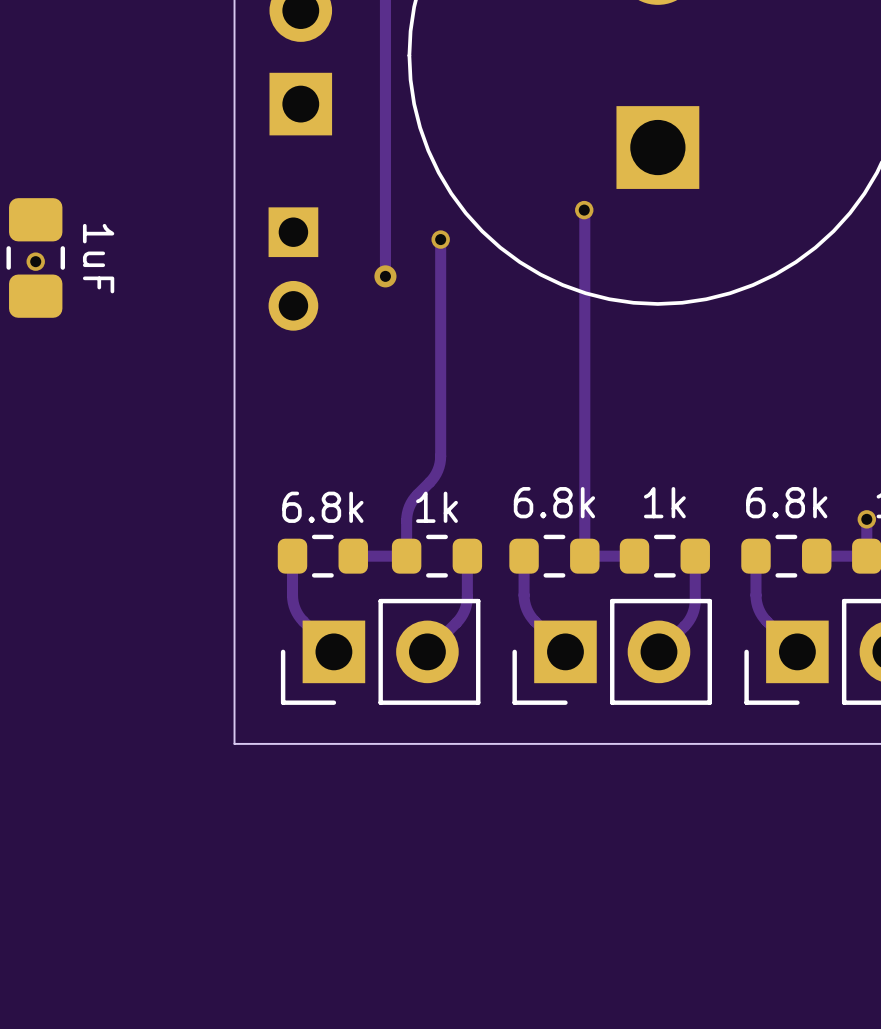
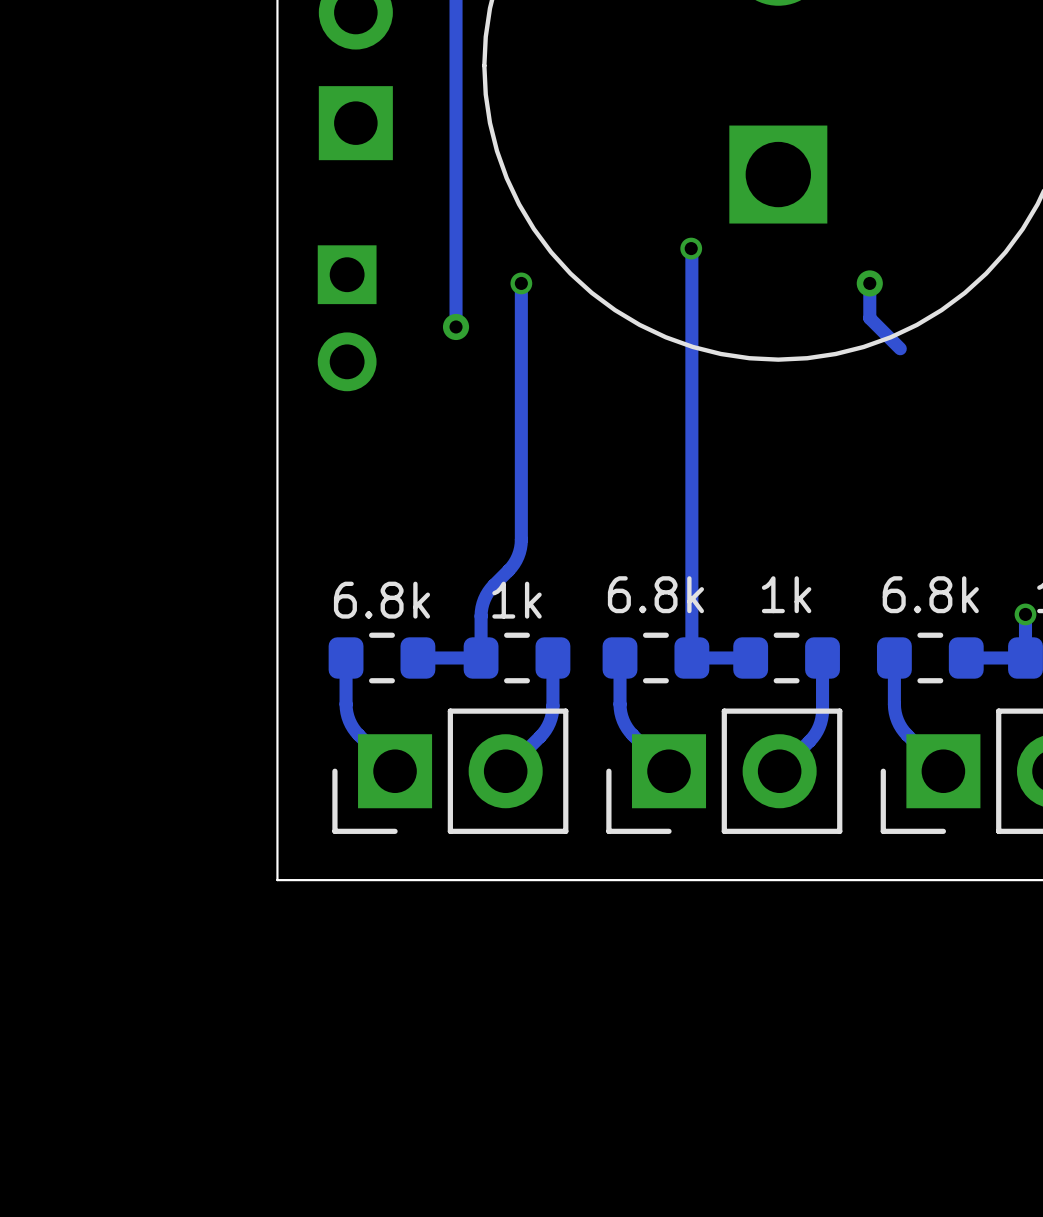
track: none -> (869, 283) (869, 318) (900, 348)
via: none -> (869, 283)
part: 1uF (35, 257) -> none
via: (35, 261) -> none

